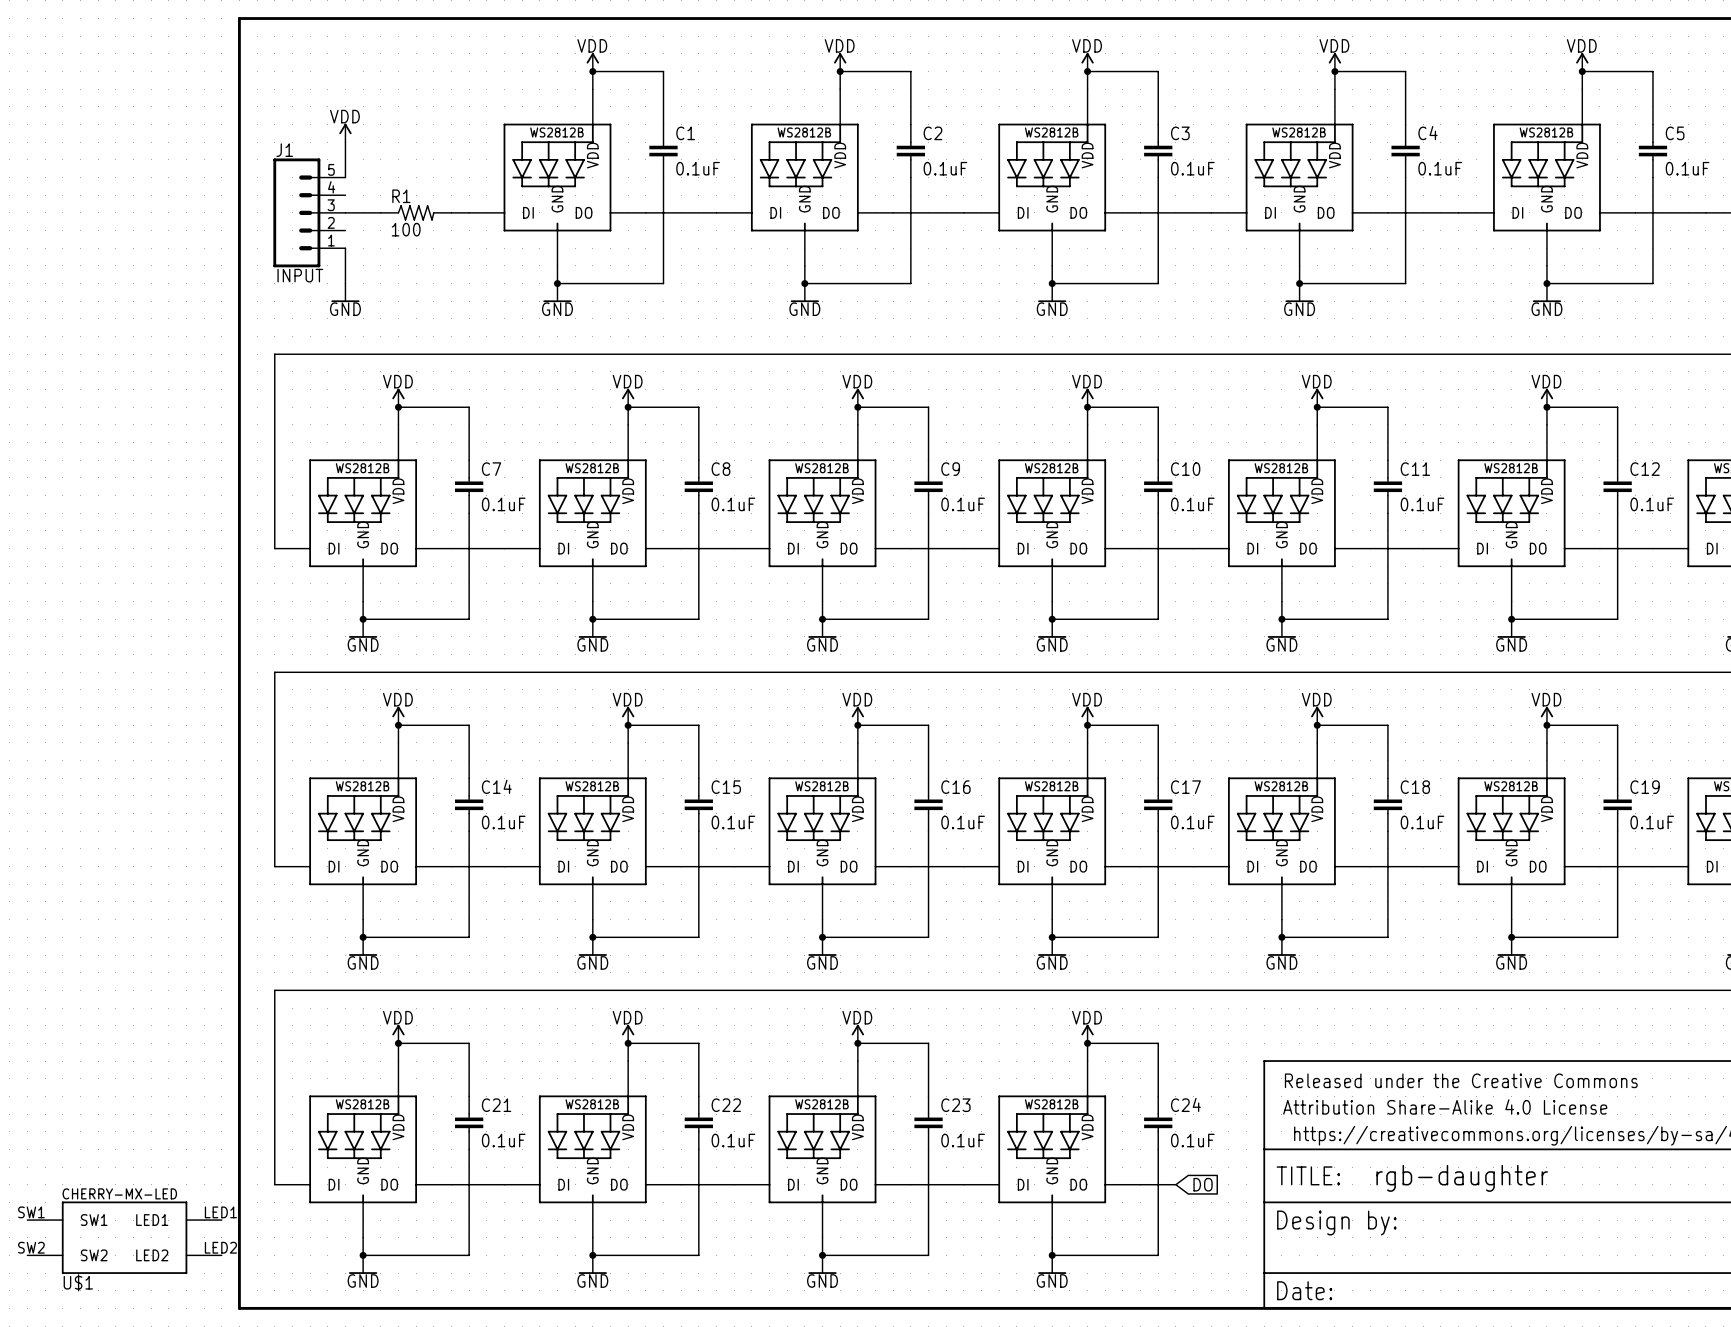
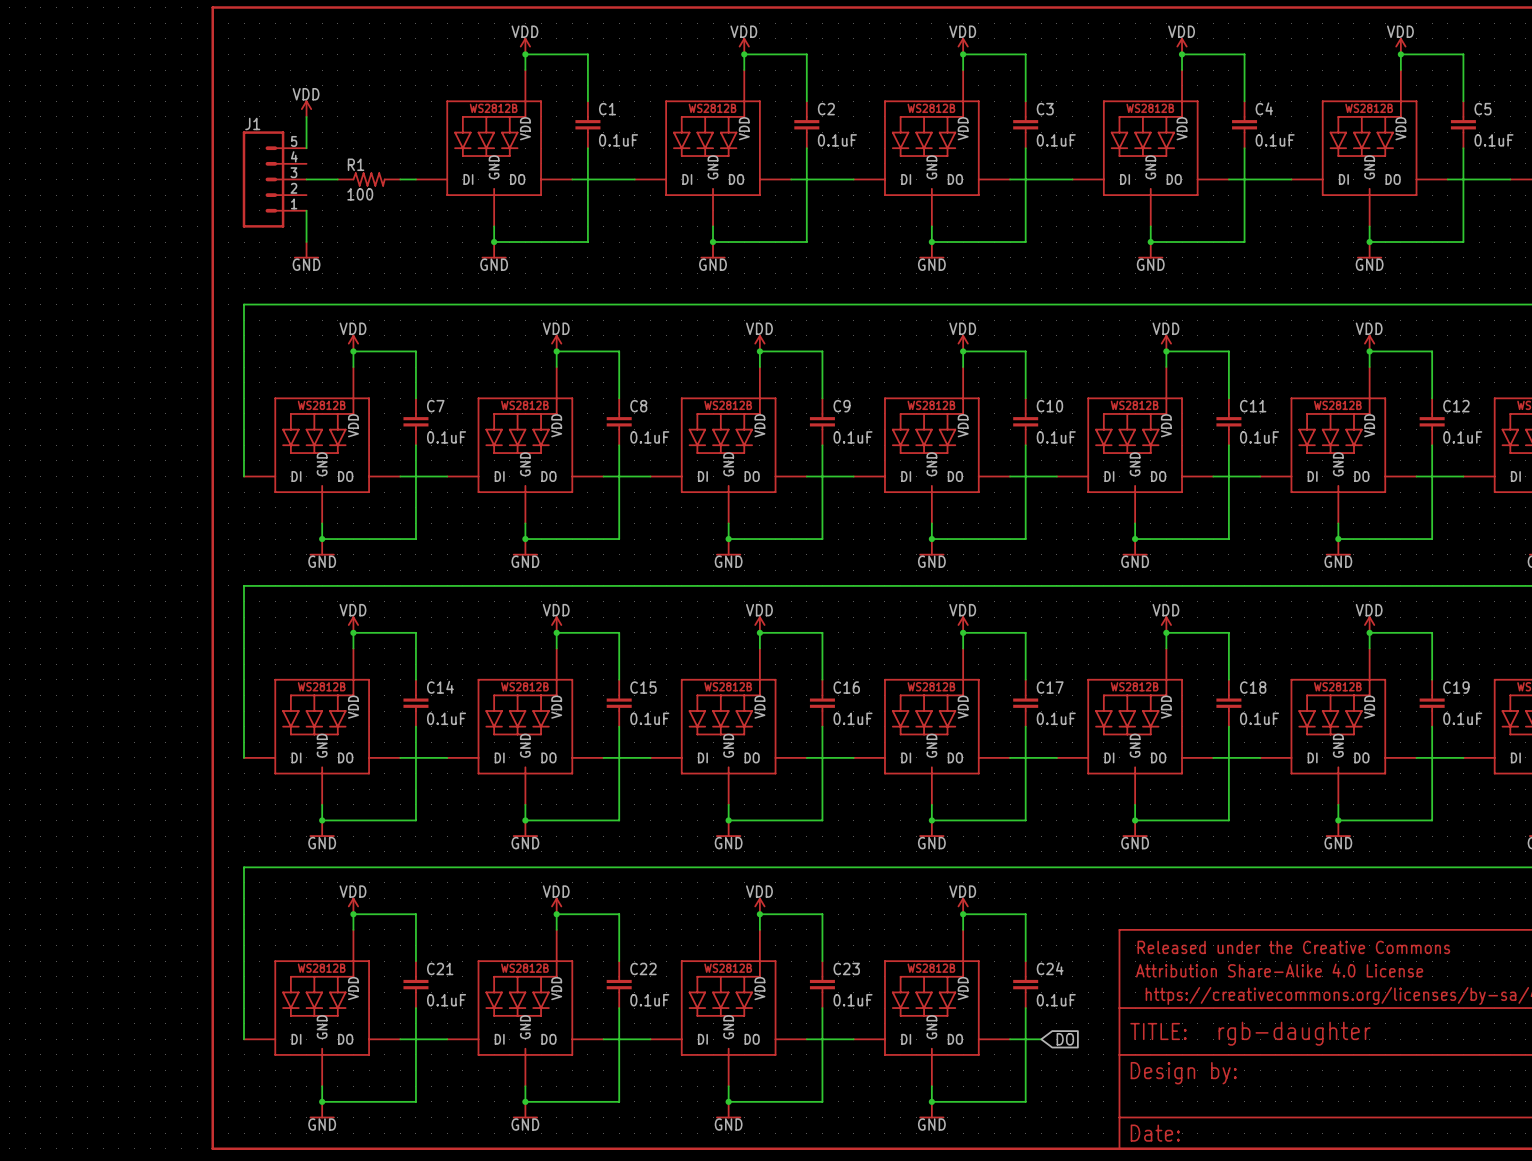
J1 value: INPUT (300, 275) -> none
U$1: (124, 1237) -> none

